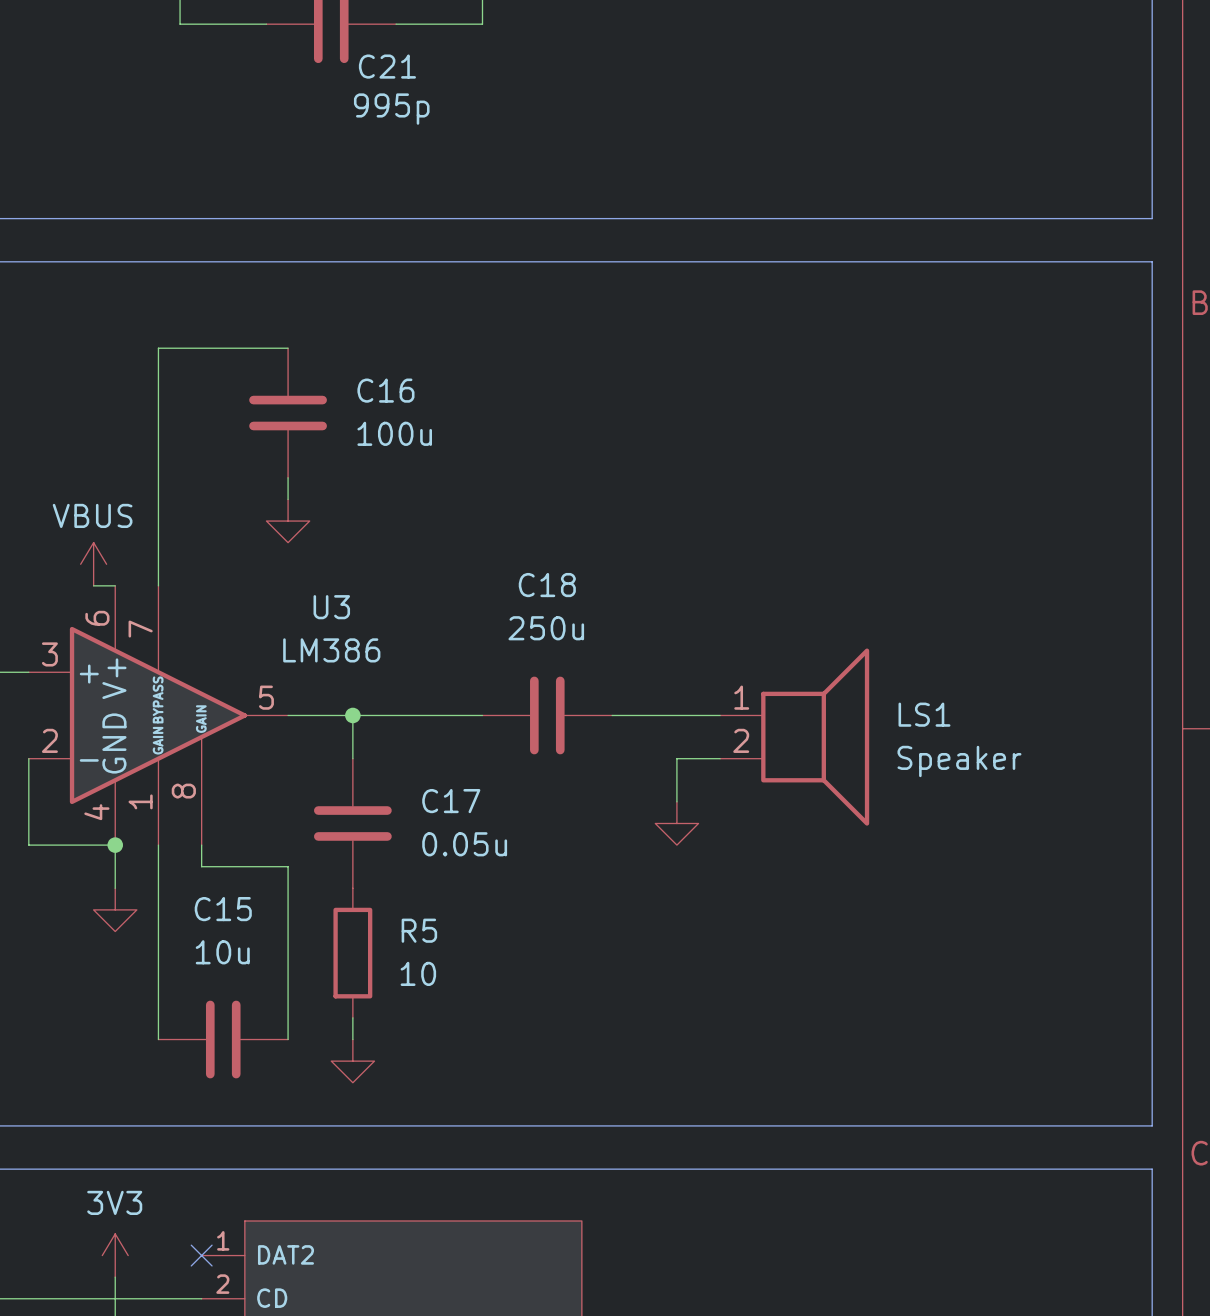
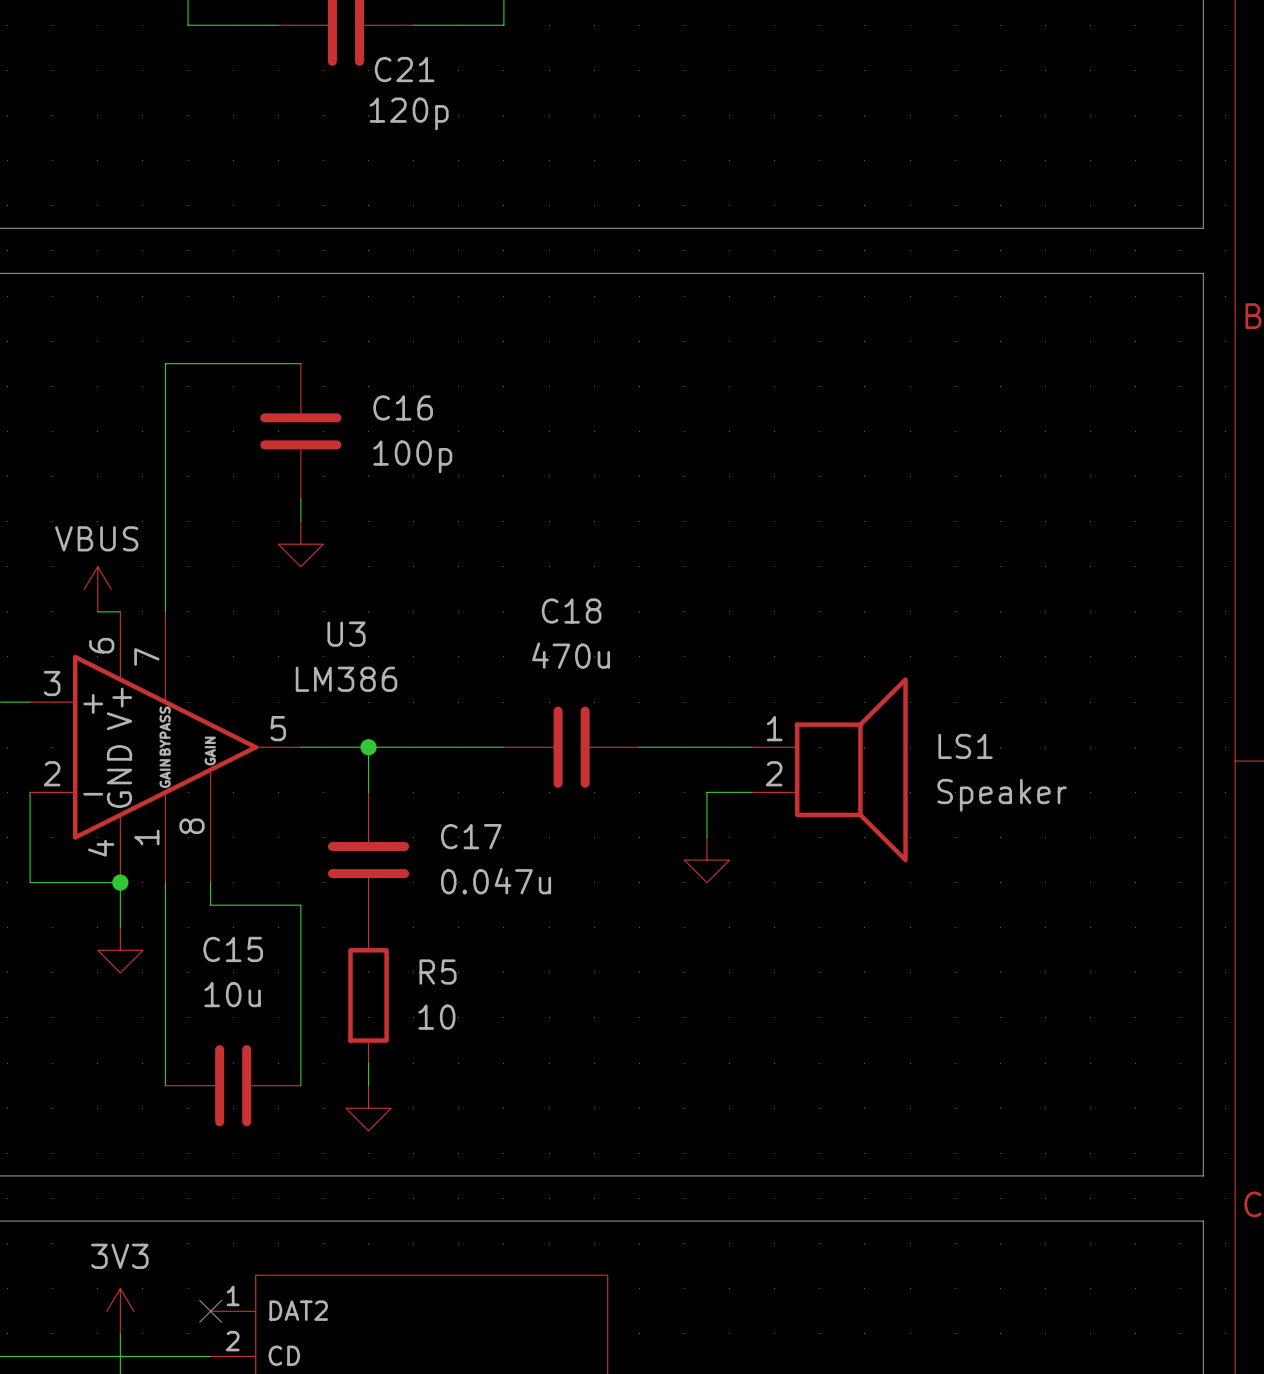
C21 value: 995p (391, 109) -> 120p (409, 113)
C16 value: 100u (394, 433) -> 100p (412, 456)
C18 value: 250u (546, 628) -> 470u (571, 655)
C17 value: 0.05u (464, 844) -> 0.047u (496, 881)

